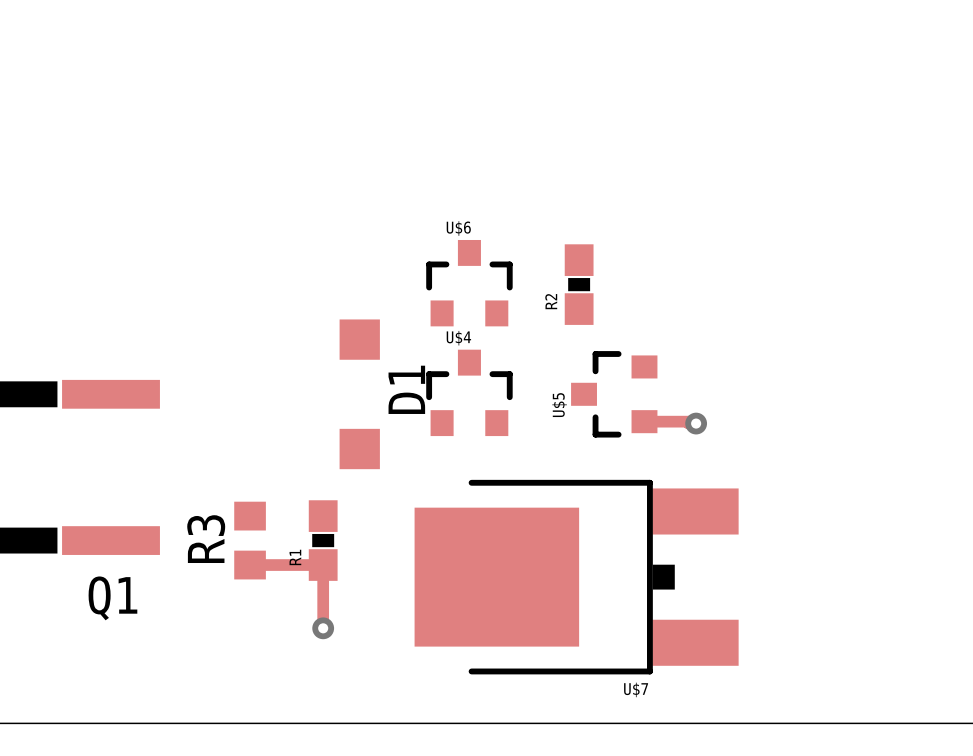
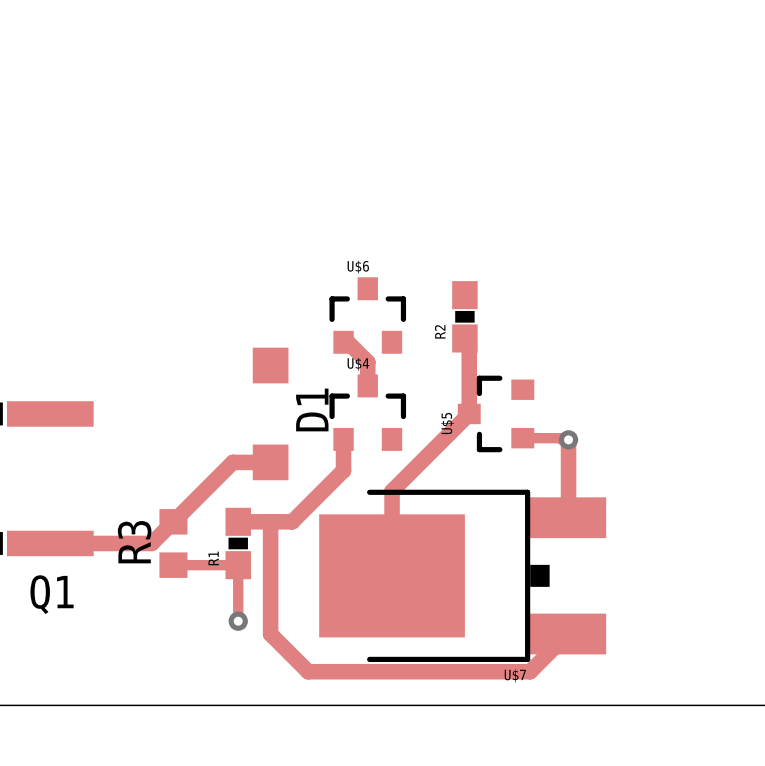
track: none -> (464, 338) (469, 342) (469, 413) (392, 491) (392, 575)
track: none -> (343, 342) (347, 342) (367, 362) (367, 385)
track: none -> (343, 439) (343, 470) (292, 521) (238, 521)
track: none -> (568, 439) (567, 517)
track: none -> (270, 462) (232, 462) (151, 543) (50, 543)
track: none -> (270, 521) (270, 634) (308, 671) (530, 671) (567, 634)

